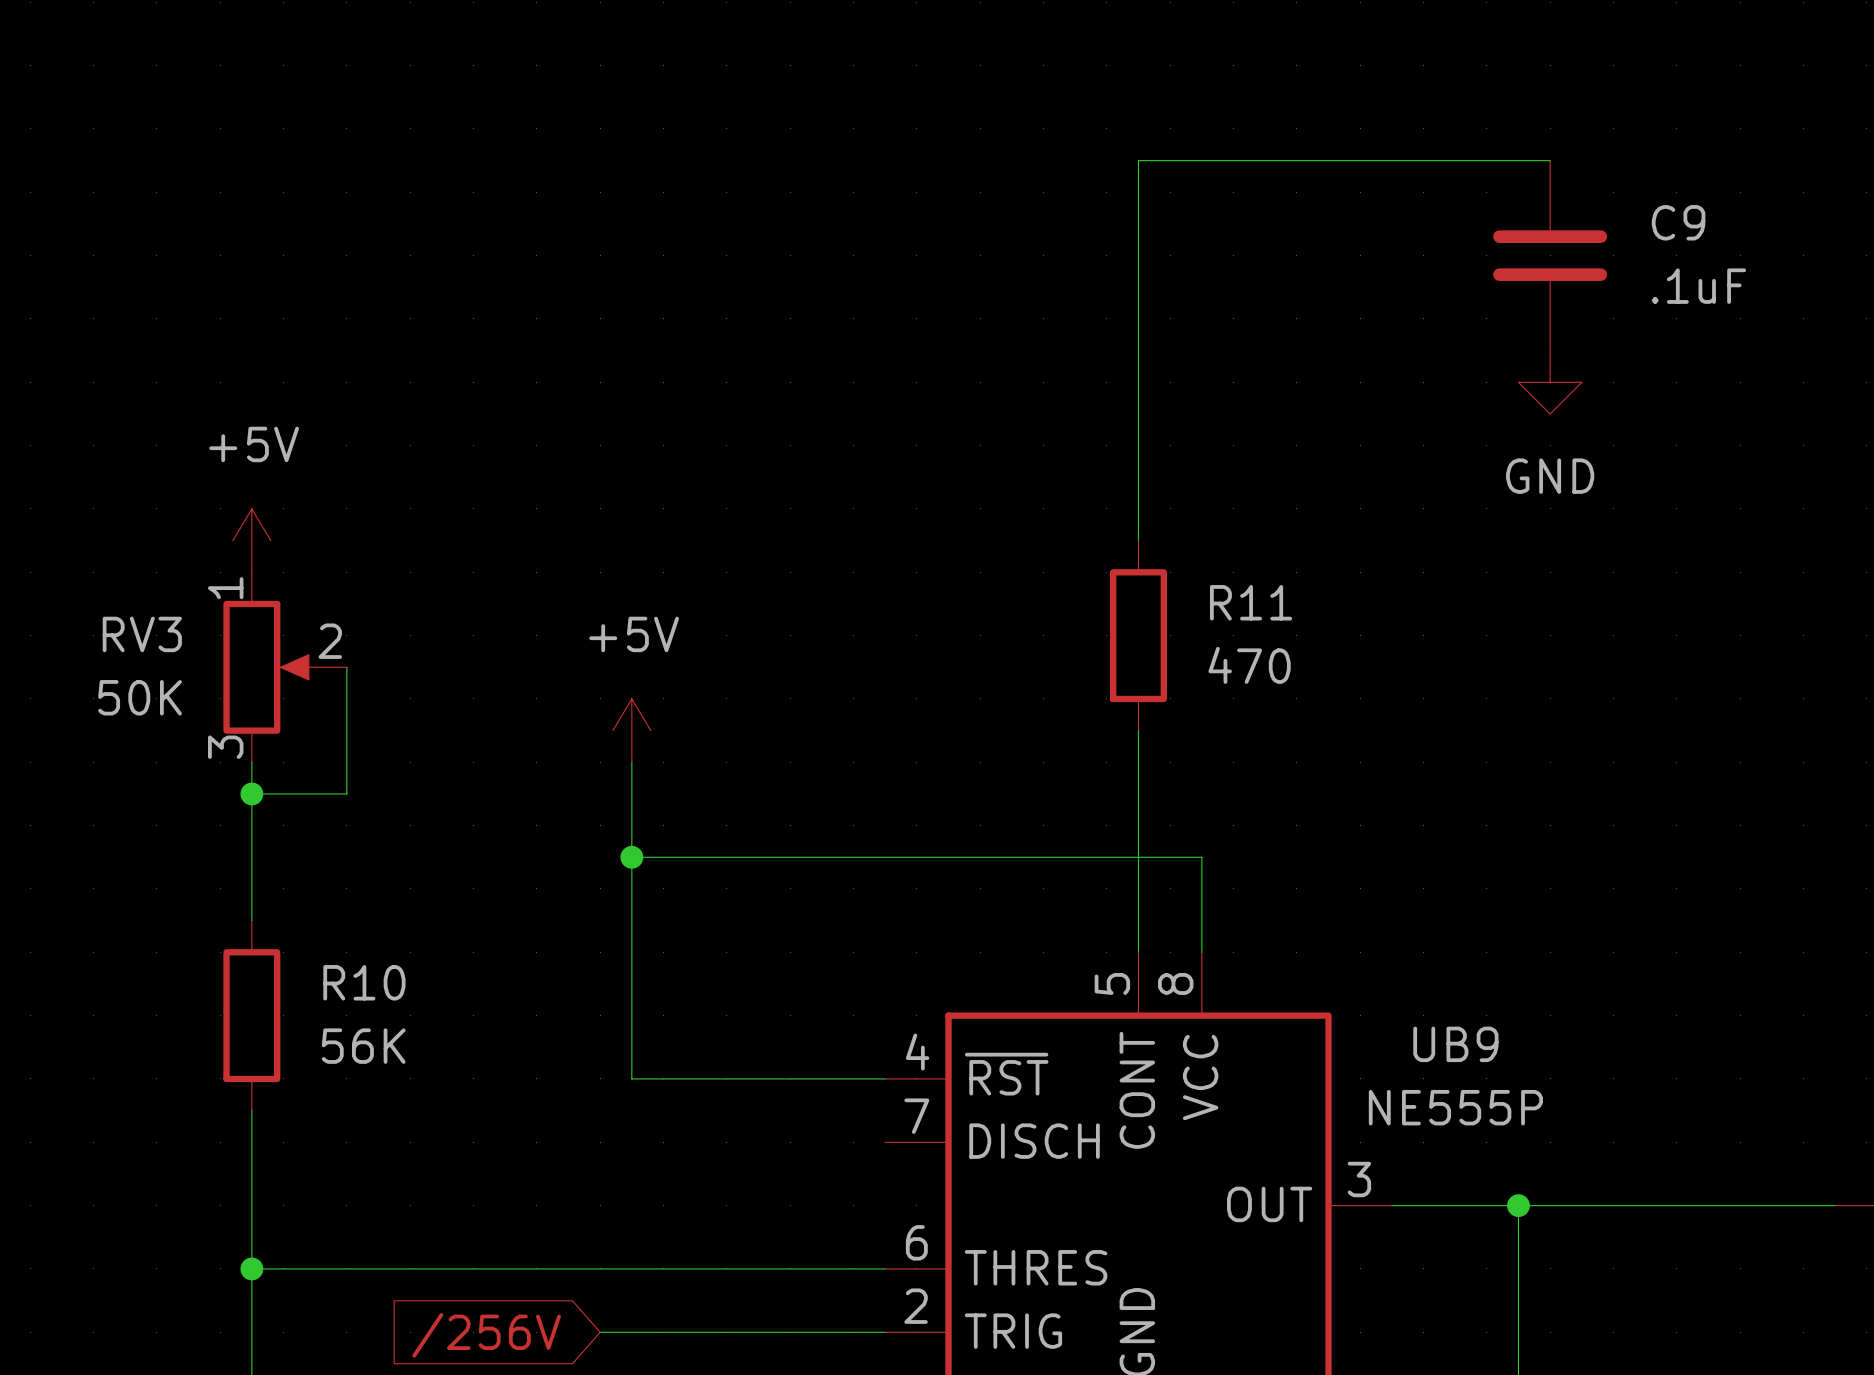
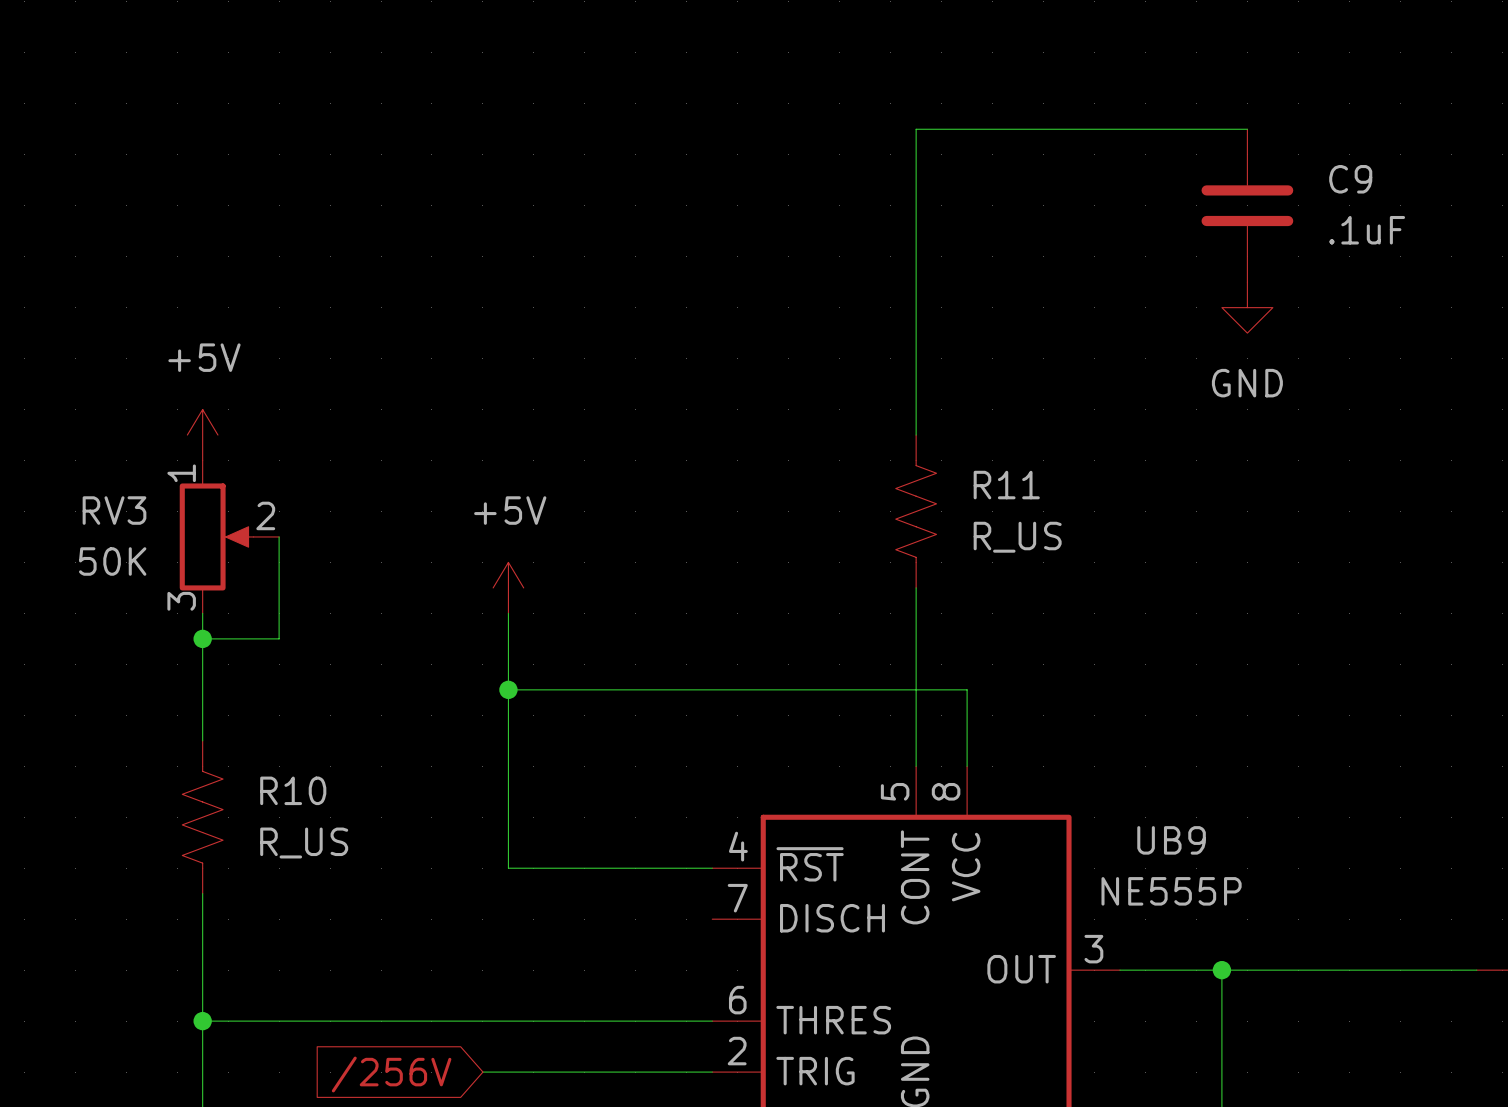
R11 symbol: [1110, 540, 1168, 731] -> [895, 435, 937, 588]
R11 value: 470 (1249, 665) -> R_US (1017, 537)
R10 symbol: [223, 920, 281, 1111] -> [182, 740, 224, 894]
R10 value: 56K (363, 1046) -> R_US (304, 843)

